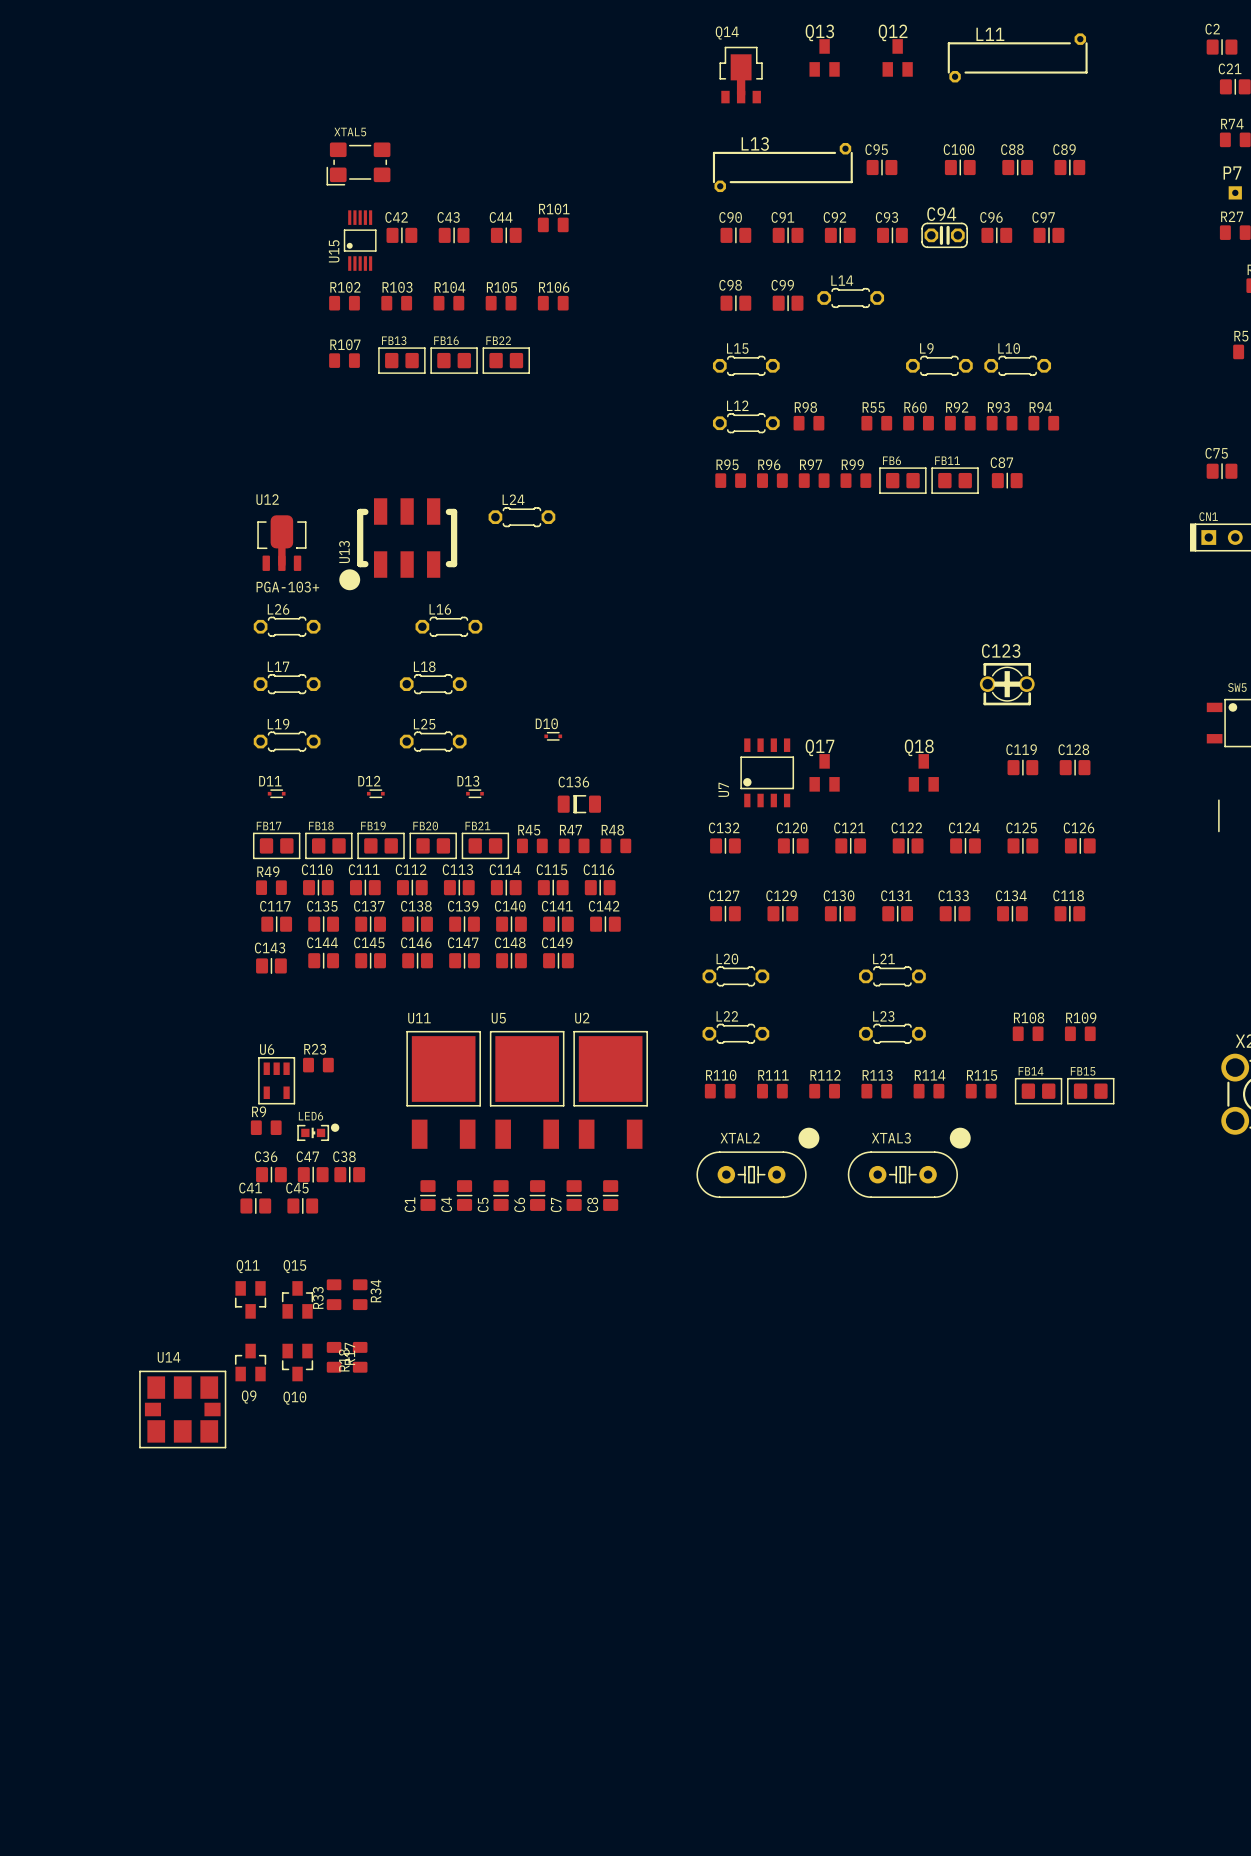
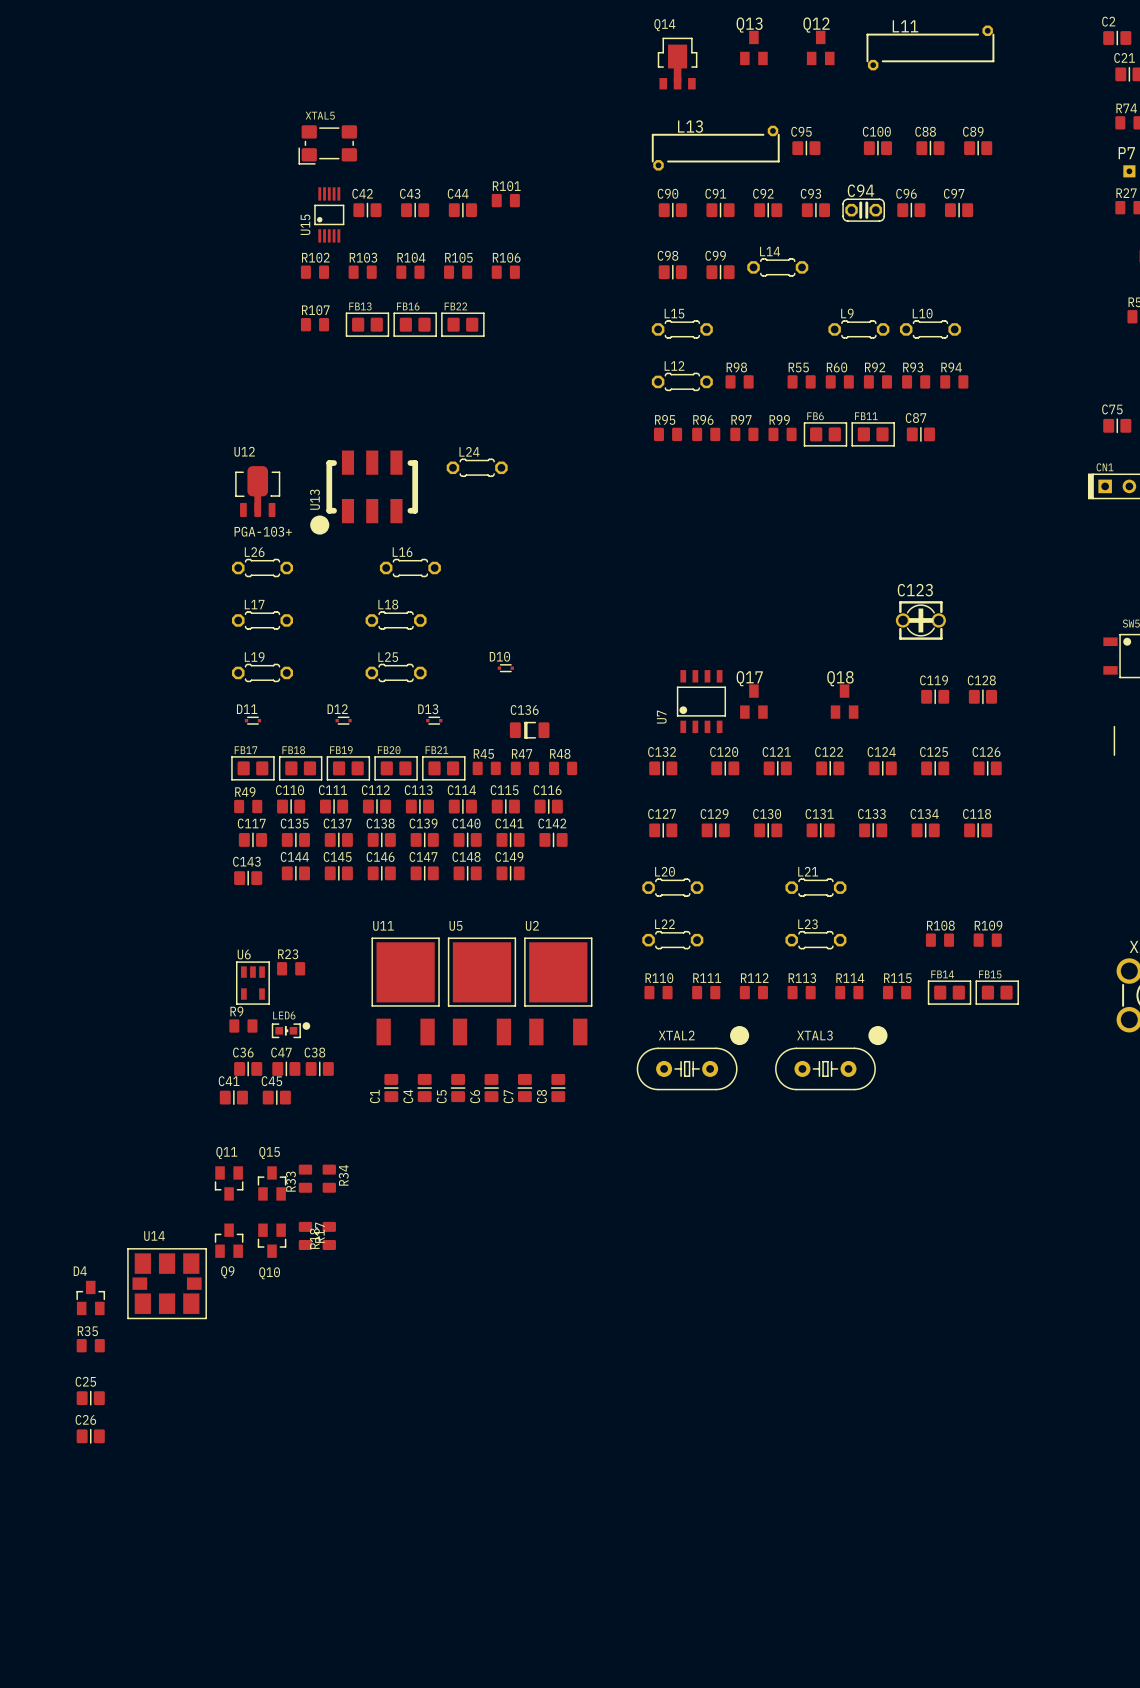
D4: none -> (90, 1297)
R35: none -> (90, 1345)
C25: none -> (90, 1398)
C26: none -> (90, 1436)

